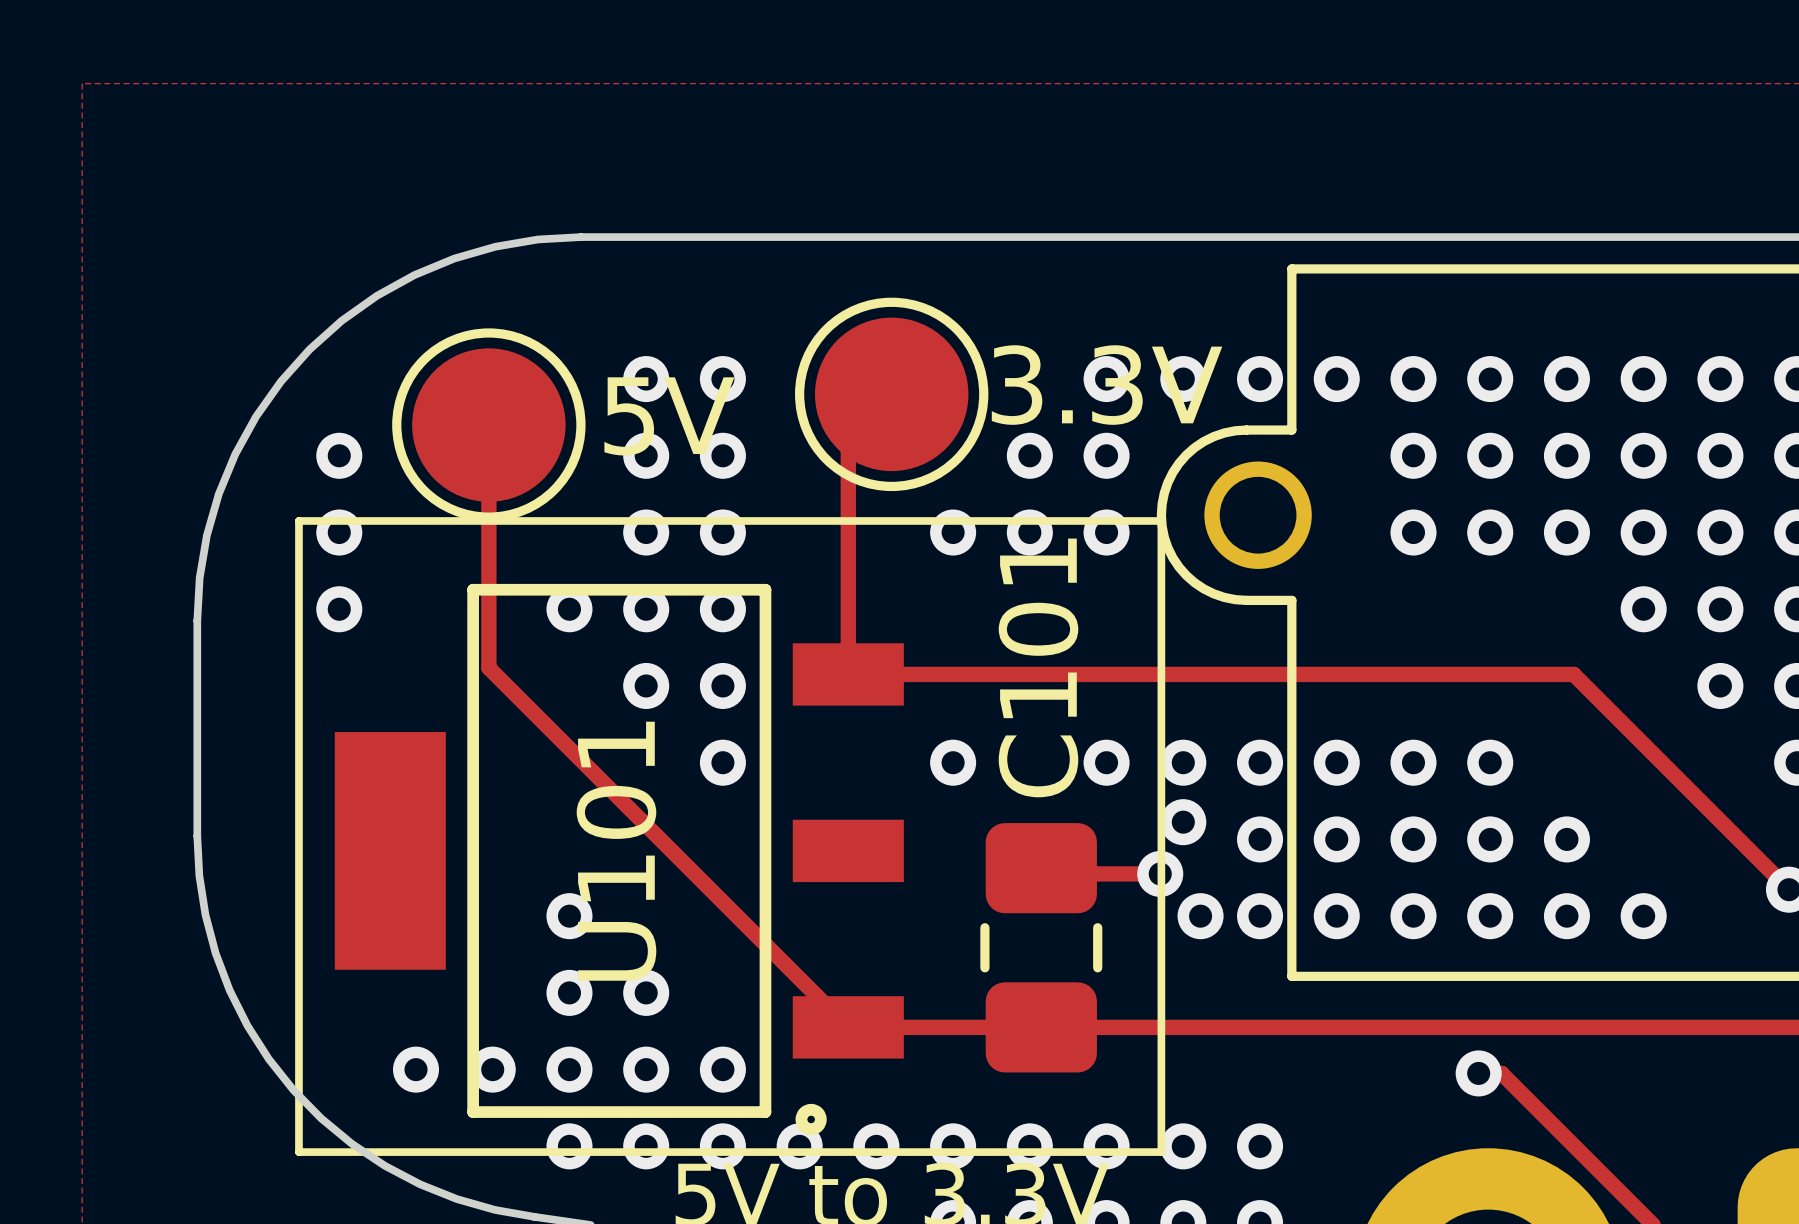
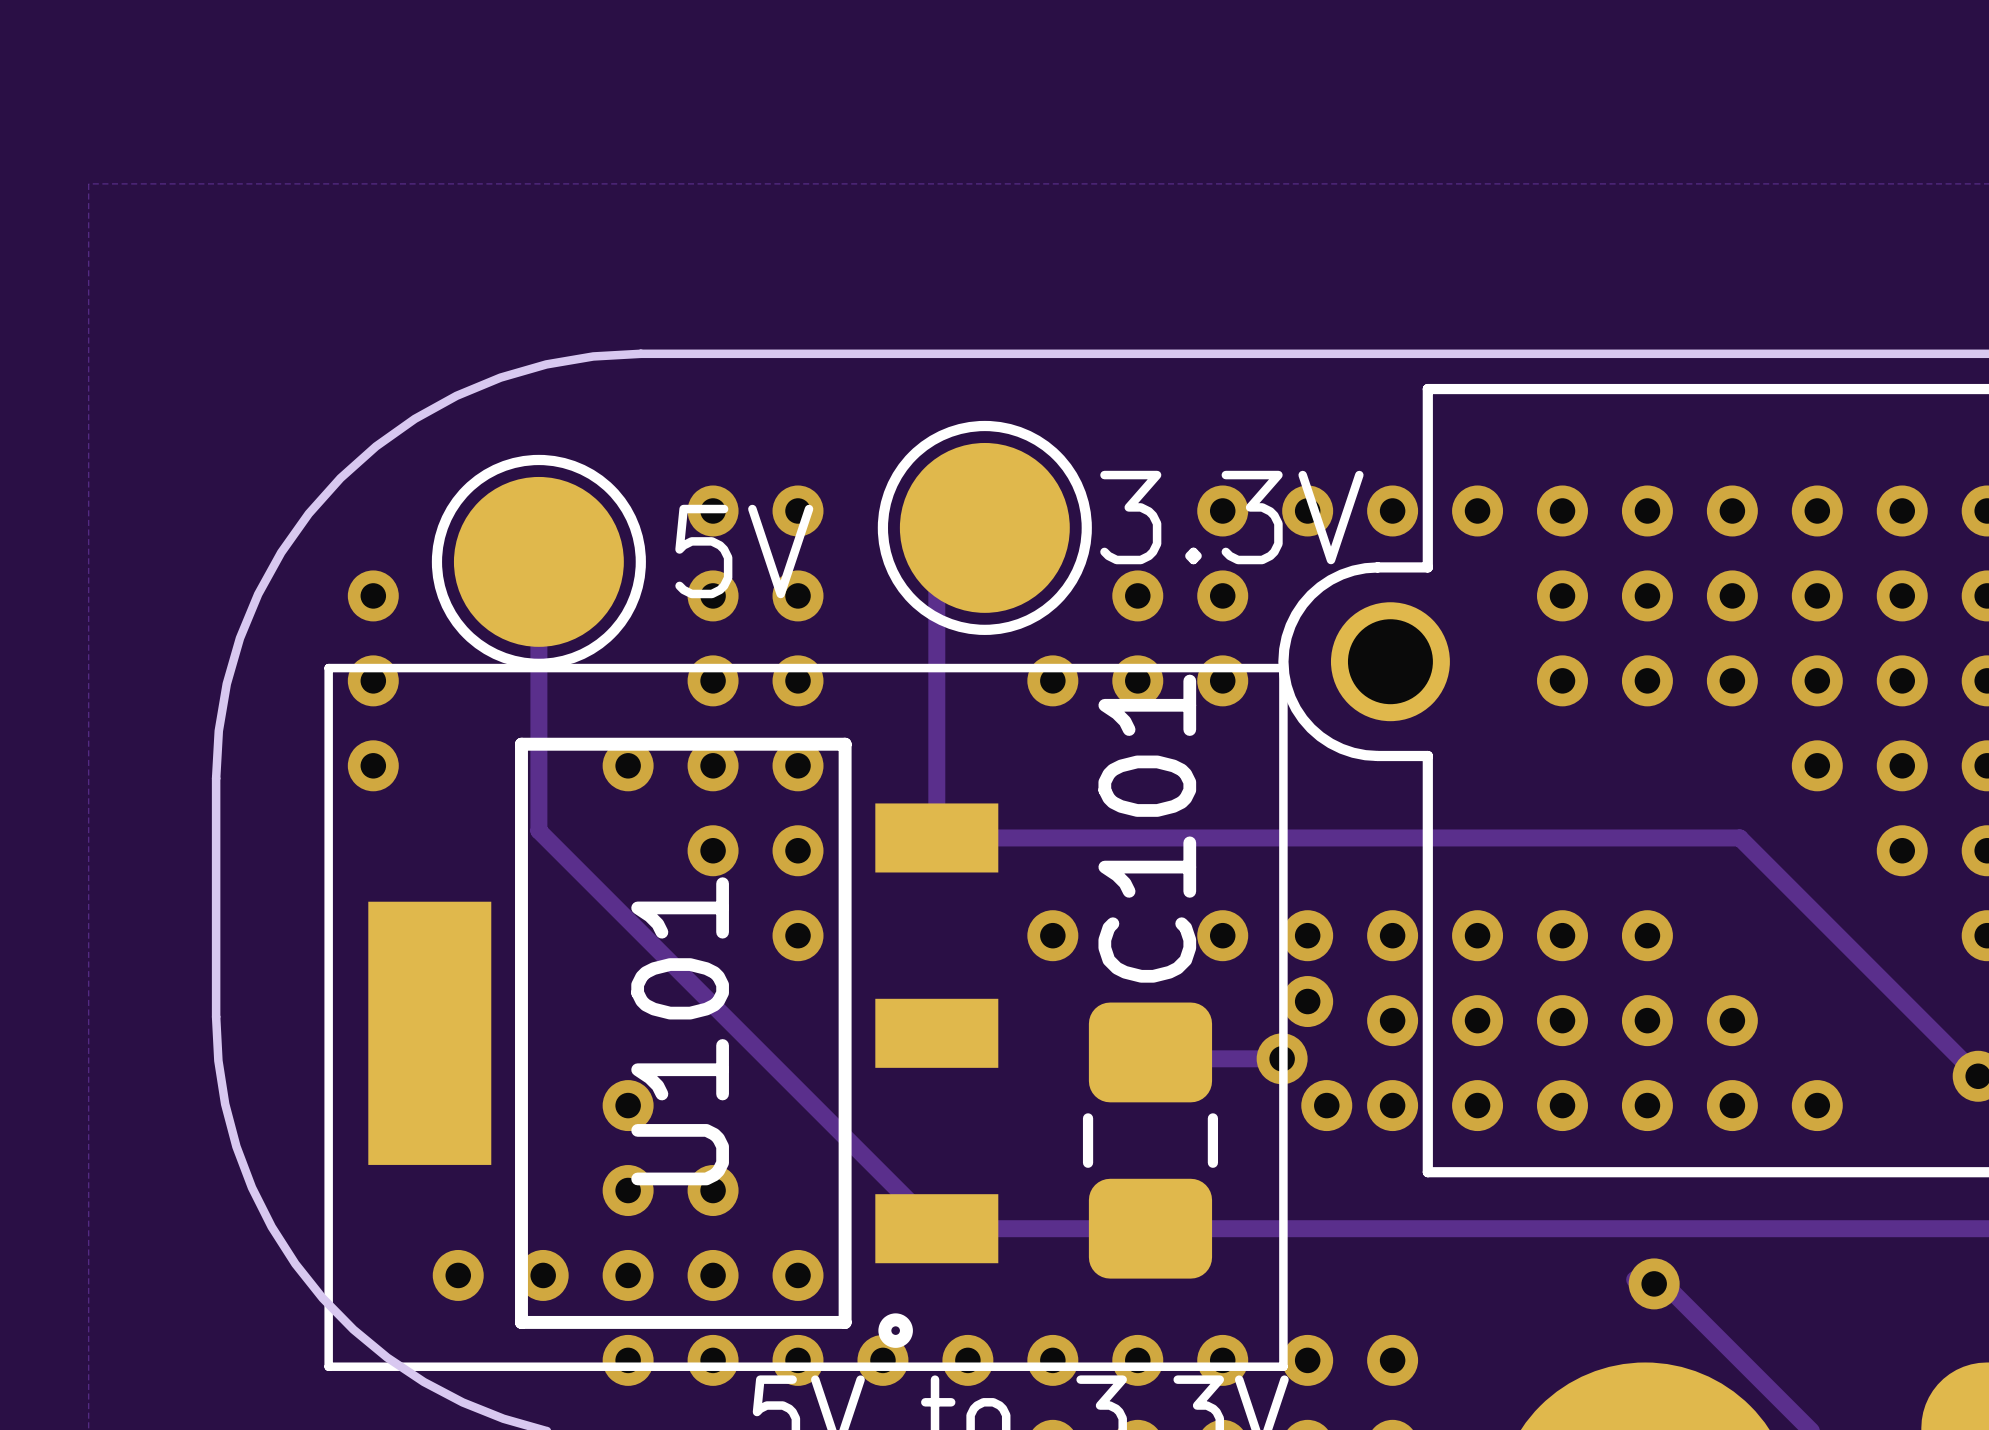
via position: (1478, 1073) -> (1654, 1283)

